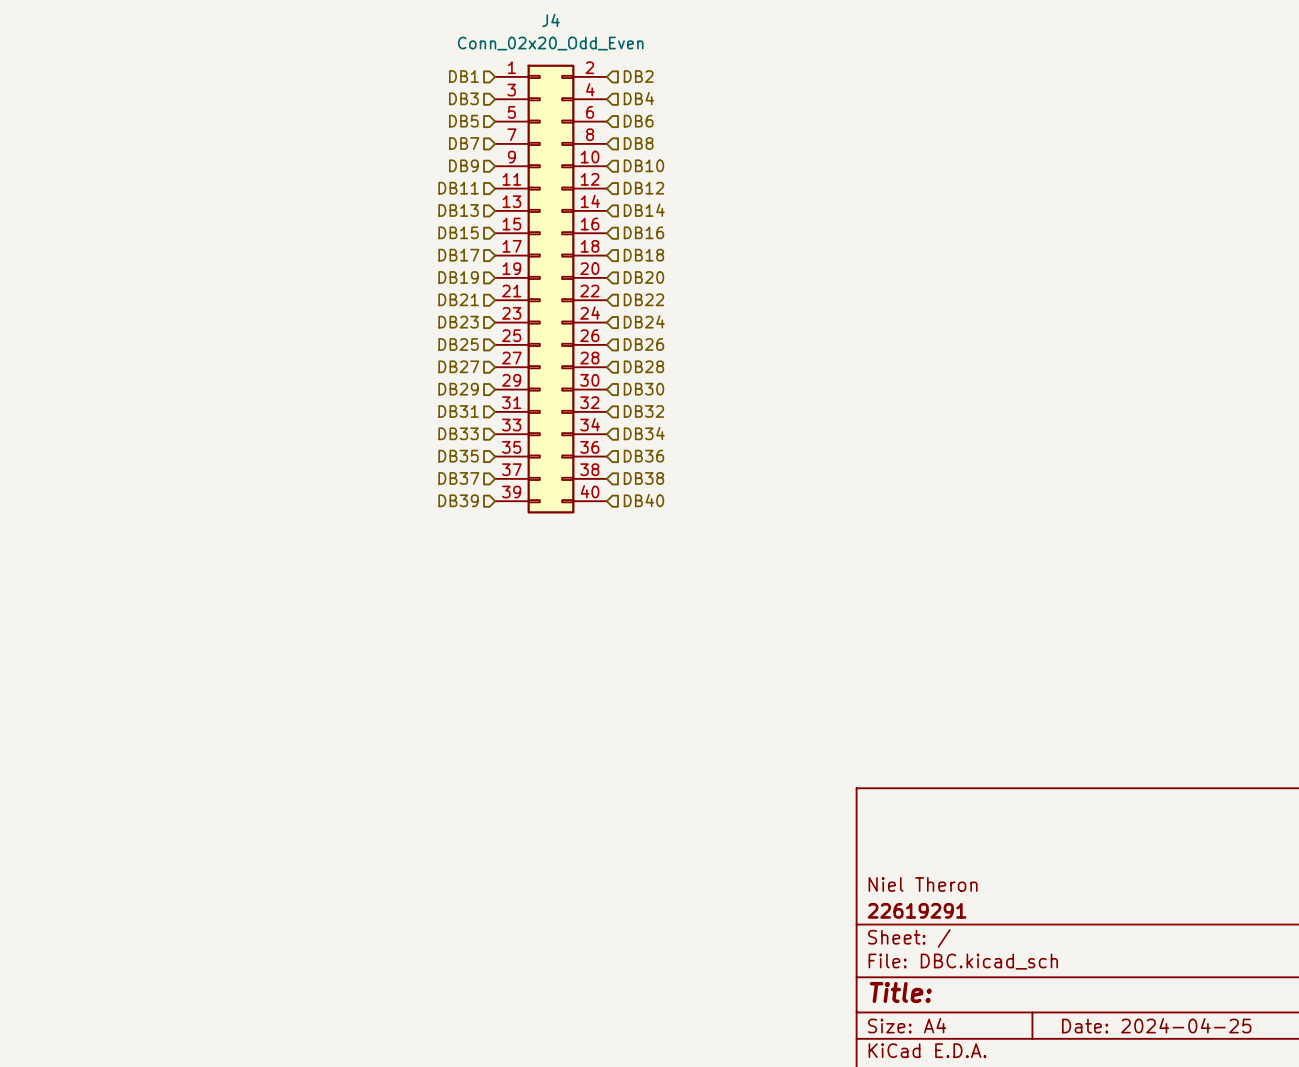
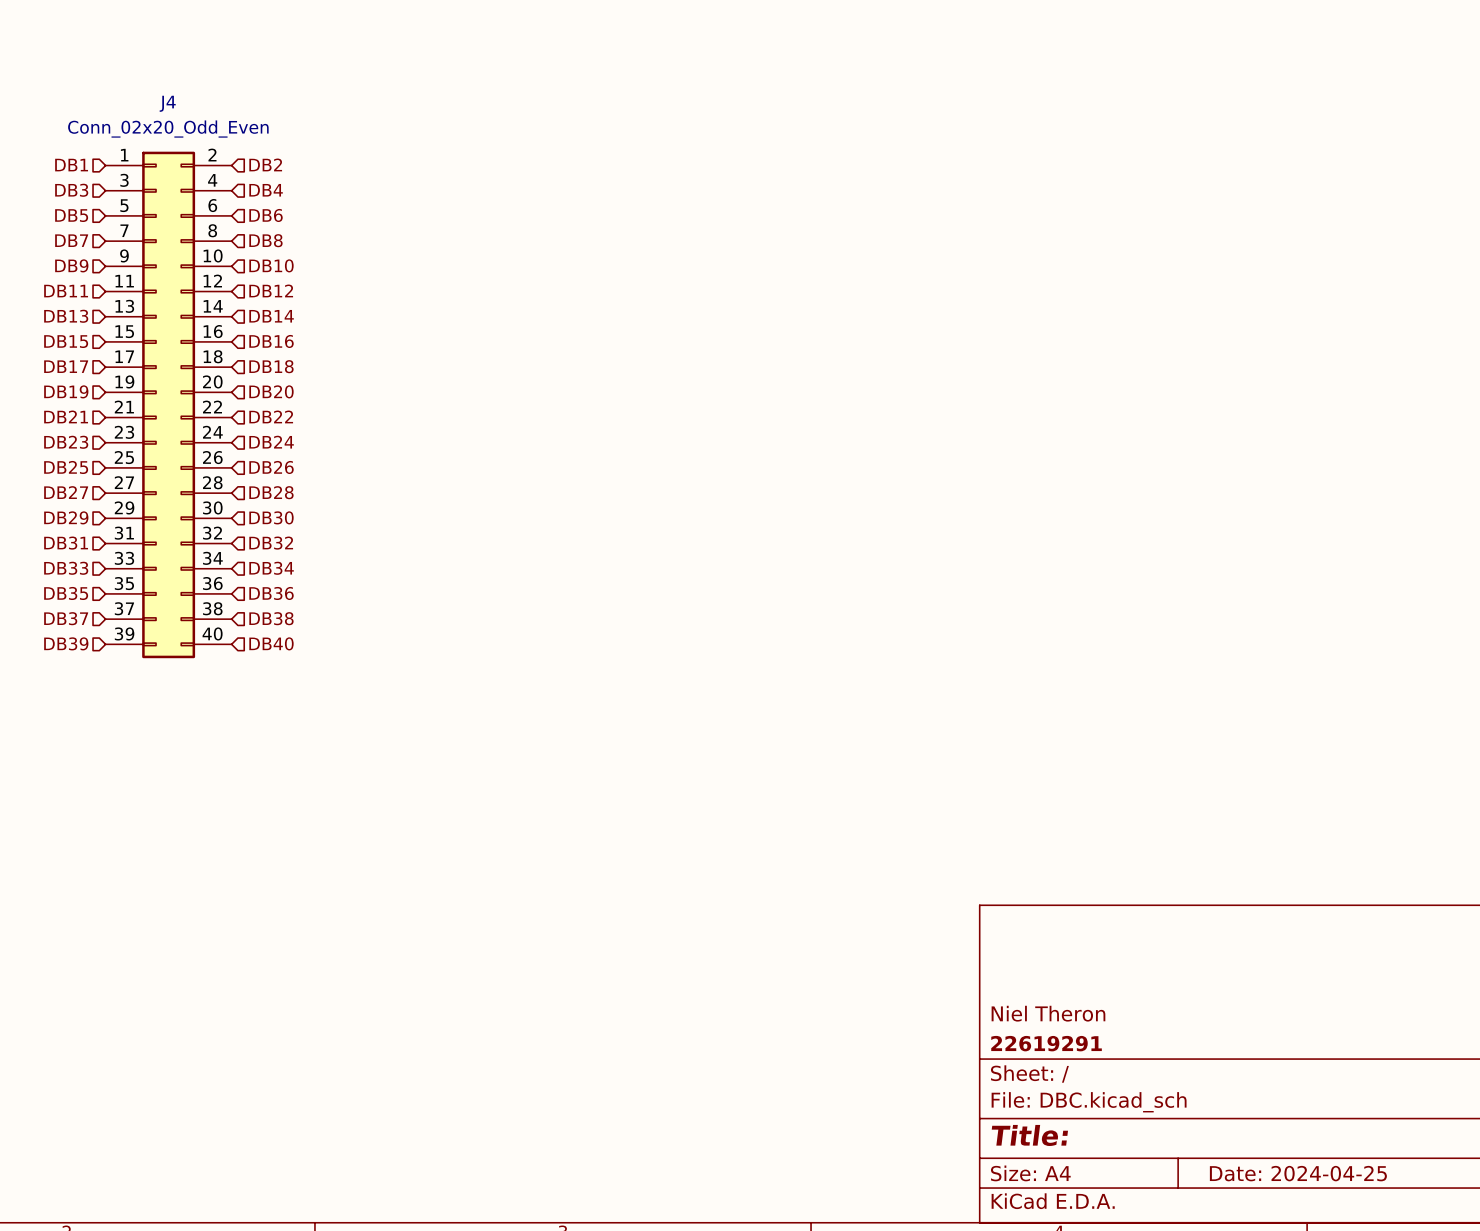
hierarchical label: DB1 (463, 76) -> none
hierarchical label: DB2 (638, 76) -> none
hierarchical label: DB3 (463, 98) -> none
hierarchical label: DB4 (638, 98) -> none
hierarchical label: DB5 (463, 121) -> none
hierarchical label: DB6 (638, 121) -> none
hierarchical label: none -> DB1 (71, 165)
hierarchical label: none -> DB2 (265, 164)
hierarchical label: DB7 (464, 143) -> none
hierarchical label: DB8 (638, 143) -> none
hierarchical label: none -> DB3 (71, 190)
hierarchical label: none -> DB4 (266, 190)
hierarchical label: DB9 (463, 165) -> none
hierarchical label: DB10 (643, 165) -> none
hierarchical label: none -> DB5 (71, 215)
hierarchical label: none -> DB6 (266, 215)
hierarchical label: DB11 (458, 188) -> none
hierarchical label: DB12 (643, 188) -> none
hierarchical label: none -> DB7 (71, 240)
hierarchical label: none -> DB8 (265, 240)
hierarchical label: DB13 (458, 210) -> none
hierarchical label: DB14 (644, 210) -> none
hierarchical label: none -> DB9 (71, 265)
hierarchical label: none -> DB10 (271, 265)
hierarchical label: DB15 (458, 232) -> none
hierarchical label: DB16 (643, 232) -> none
hierarchical label: none -> DB11 (66, 291)
hierarchical label: none -> DB12 (271, 290)
hierarchical label: DB17 (458, 255) -> none
hierarchical label: DB18 (643, 255) -> none
hierarchical label: none -> DB13 (66, 316)
hierarchical label: none -> DB14 (271, 316)
hierarchical label: DB19 (458, 277) -> none
hierarchical label: DB20 (643, 277) -> none
hierarchical label: none -> DB15 (66, 341)
hierarchical label: none -> DB16 (271, 341)
J4 position: (551, 289) -> (168, 404)
hierarchical label: DB21 (458, 299) -> none
hierarchical label: DB22 (643, 299) -> none
hierarchical label: none -> DB17 (66, 366)
hierarchical label: none -> DB18 (271, 366)
hierarchical label: DB24 (644, 321) -> none
hierarchical label: DB23 (458, 322) -> none
hierarchical label: none -> DB19 (66, 391)
hierarchical label: none -> DB20 (271, 391)
hierarchical label: DB25 (458, 344) -> none
hierarchical label: DB26 (643, 344) -> none
hierarchical label: none -> DB21 (66, 416)
hierarchical label: none -> DB22 (271, 416)
hierarchical label: DB27 (458, 366) -> none
hierarchical label: DB28 (643, 366) -> none
hierarchical label: none -> DB23 (66, 442)
hierarchical label: none -> DB24 (271, 442)
hierarchical label: DB29 (458, 389) -> none
hierarchical label: DB30 (643, 389) -> none
hierarchical label: none -> DB25 (66, 467)
hierarchical label: none -> DB26 (271, 467)
hierarchical label: DB31 (458, 411) -> none
hierarchical label: DB32 (643, 411) -> none
hierarchical label: none -> DB27 (66, 492)
hierarchical label: none -> DB28 (271, 492)
hierarchical label: DB33 (458, 433) -> none
hierarchical label: DB34 (644, 433) -> none
hierarchical label: none -> DB29 (66, 517)
hierarchical label: none -> DB30 (271, 517)
hierarchical label: DB35 (458, 456) -> none
hierarchical label: DB36 (643, 456) -> none
hierarchical label: none -> DB31 (66, 543)
hierarchical label: none -> DB32 (271, 543)
hierarchical label: DB37 (458, 478) -> none
hierarchical label: DB38 (643, 478) -> none
hierarchical label: none -> DB33 (66, 568)
hierarchical label: none -> DB34 (271, 568)
hierarchical label: DB39 (458, 500) -> none
hierarchical label: DB40 (643, 500) -> none
hierarchical label: none -> DB35 (66, 593)
hierarchical label: none -> DB36 (271, 593)
hierarchical label: none -> DB37 (66, 618)
hierarchical label: none -> DB38 (271, 618)
hierarchical label: none -> DB39 (66, 643)
hierarchical label: none -> DB40 (271, 643)

